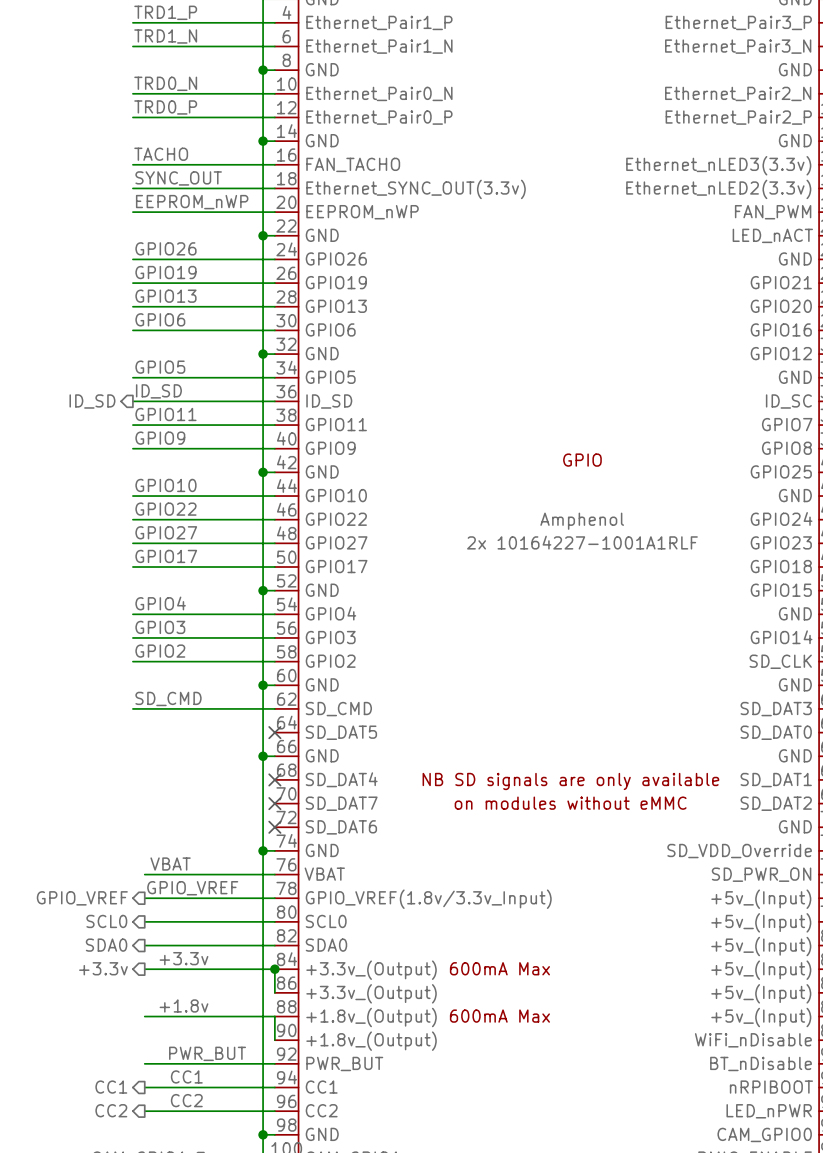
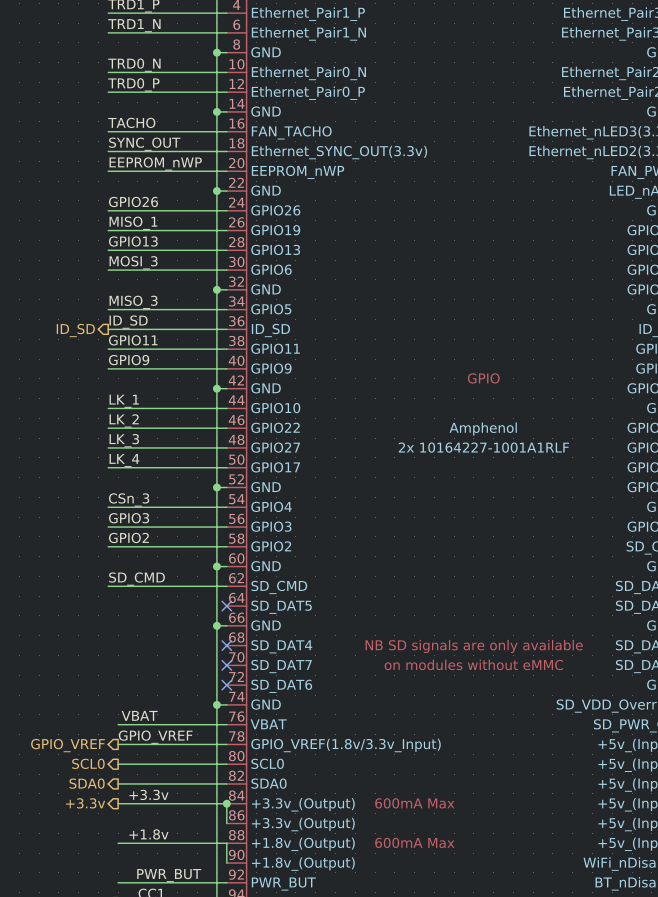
label: GPIO19 (165, 272) -> MISO_1 (133, 223)
label: GPIO6 (160, 319) -> MOSI_3 (133, 262)
label: GPIO5 (160, 367) -> MISO_3 (133, 302)
label: GPIO10 (165, 485) -> LK_1 (124, 401)
label: GPIO22 (165, 509) -> LK_2 (124, 420)
label: GPIO27 (166, 532) -> LK_3 (124, 440)
label: GPIO17 (166, 556) -> LK_4 (124, 460)
label: GPIO4 (160, 603) -> CSn_3 (129, 499)

